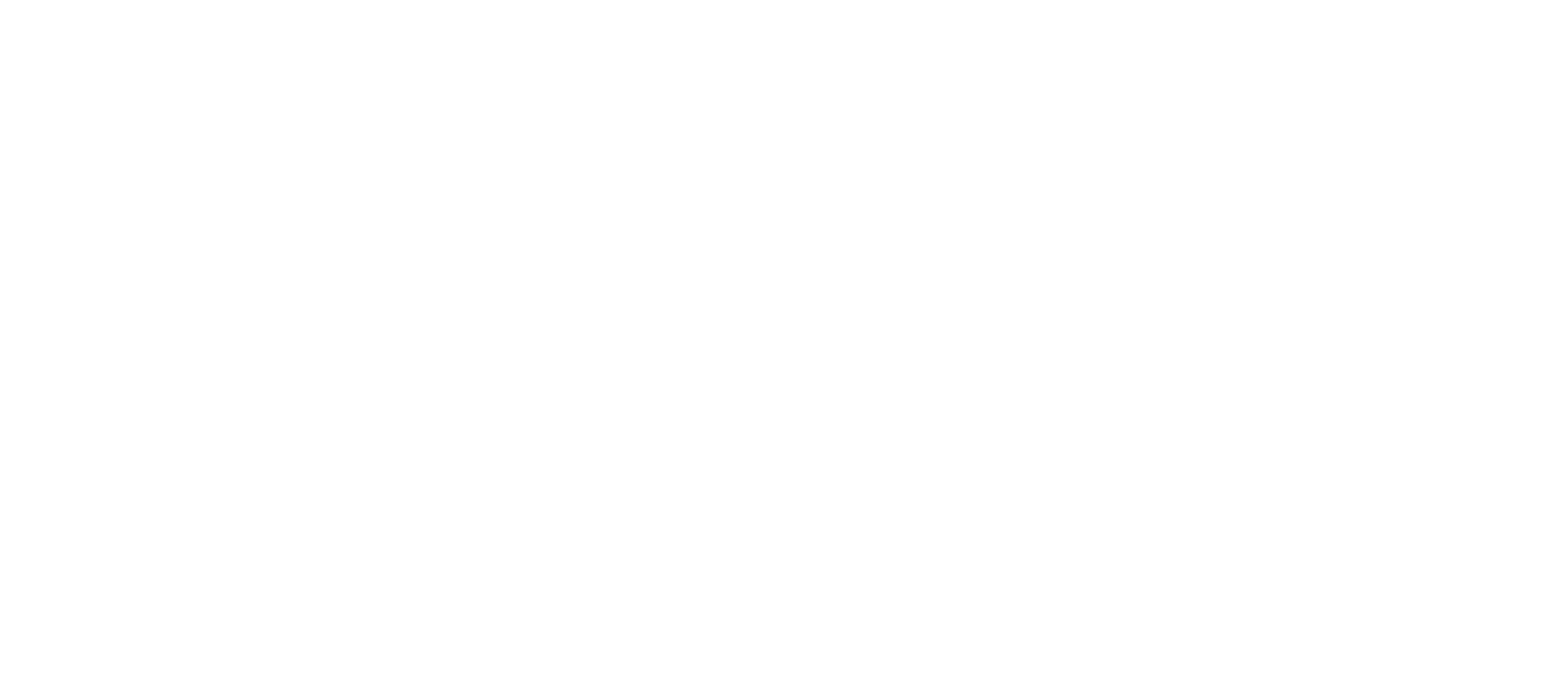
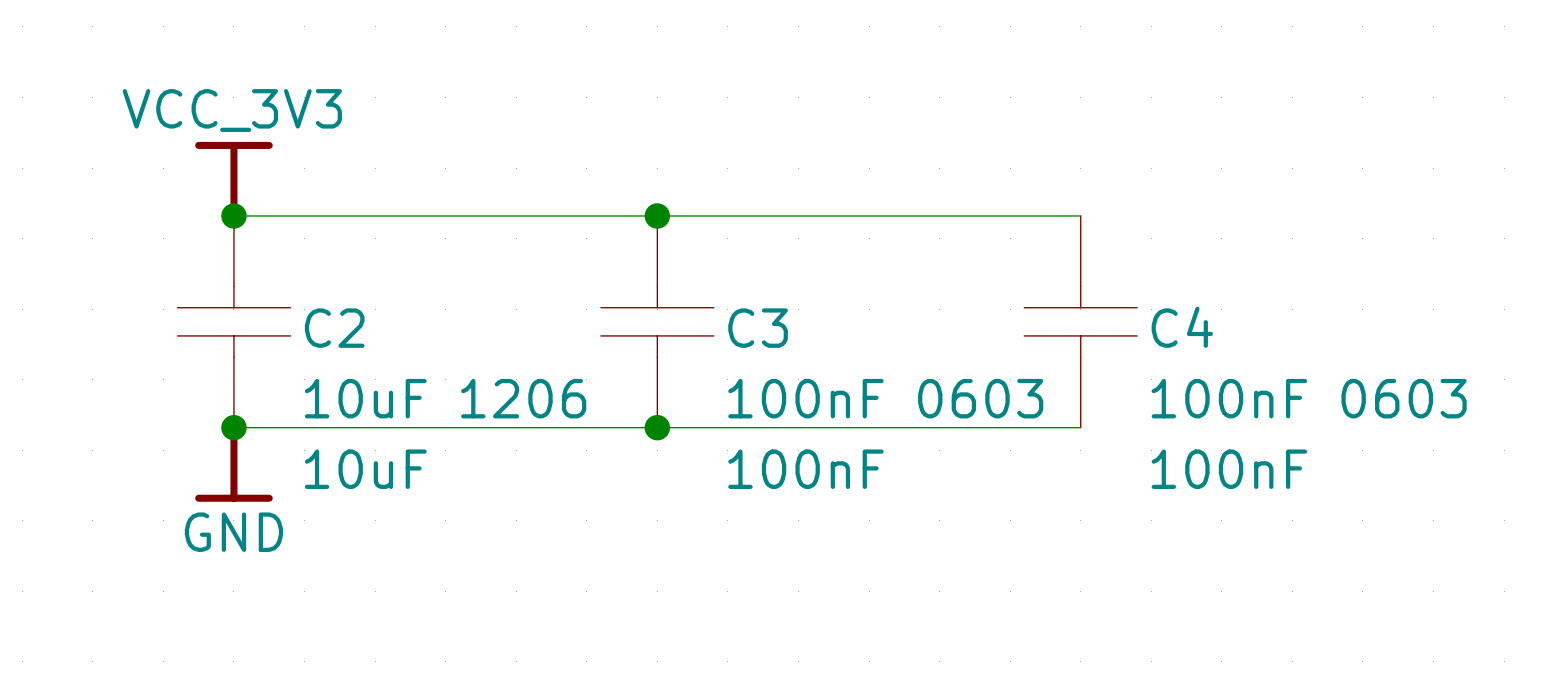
power symbol: none -> VCC_3V3 (233, 180)
wire: none -> (233, 215) (1080, 215)
junction: none -> (233, 215)
junction: none -> (657, 215)
C2: none -> 10uF 1206 (233, 321)
C3: none -> 100nF 0603 (657, 321)
C4: none -> 100nF 0603 (1080, 321)
wire: none -> (233, 427) (1080, 427)
junction: none -> (233, 427)
junction: none -> (657, 427)
power symbol: none -> GND (233, 462)

